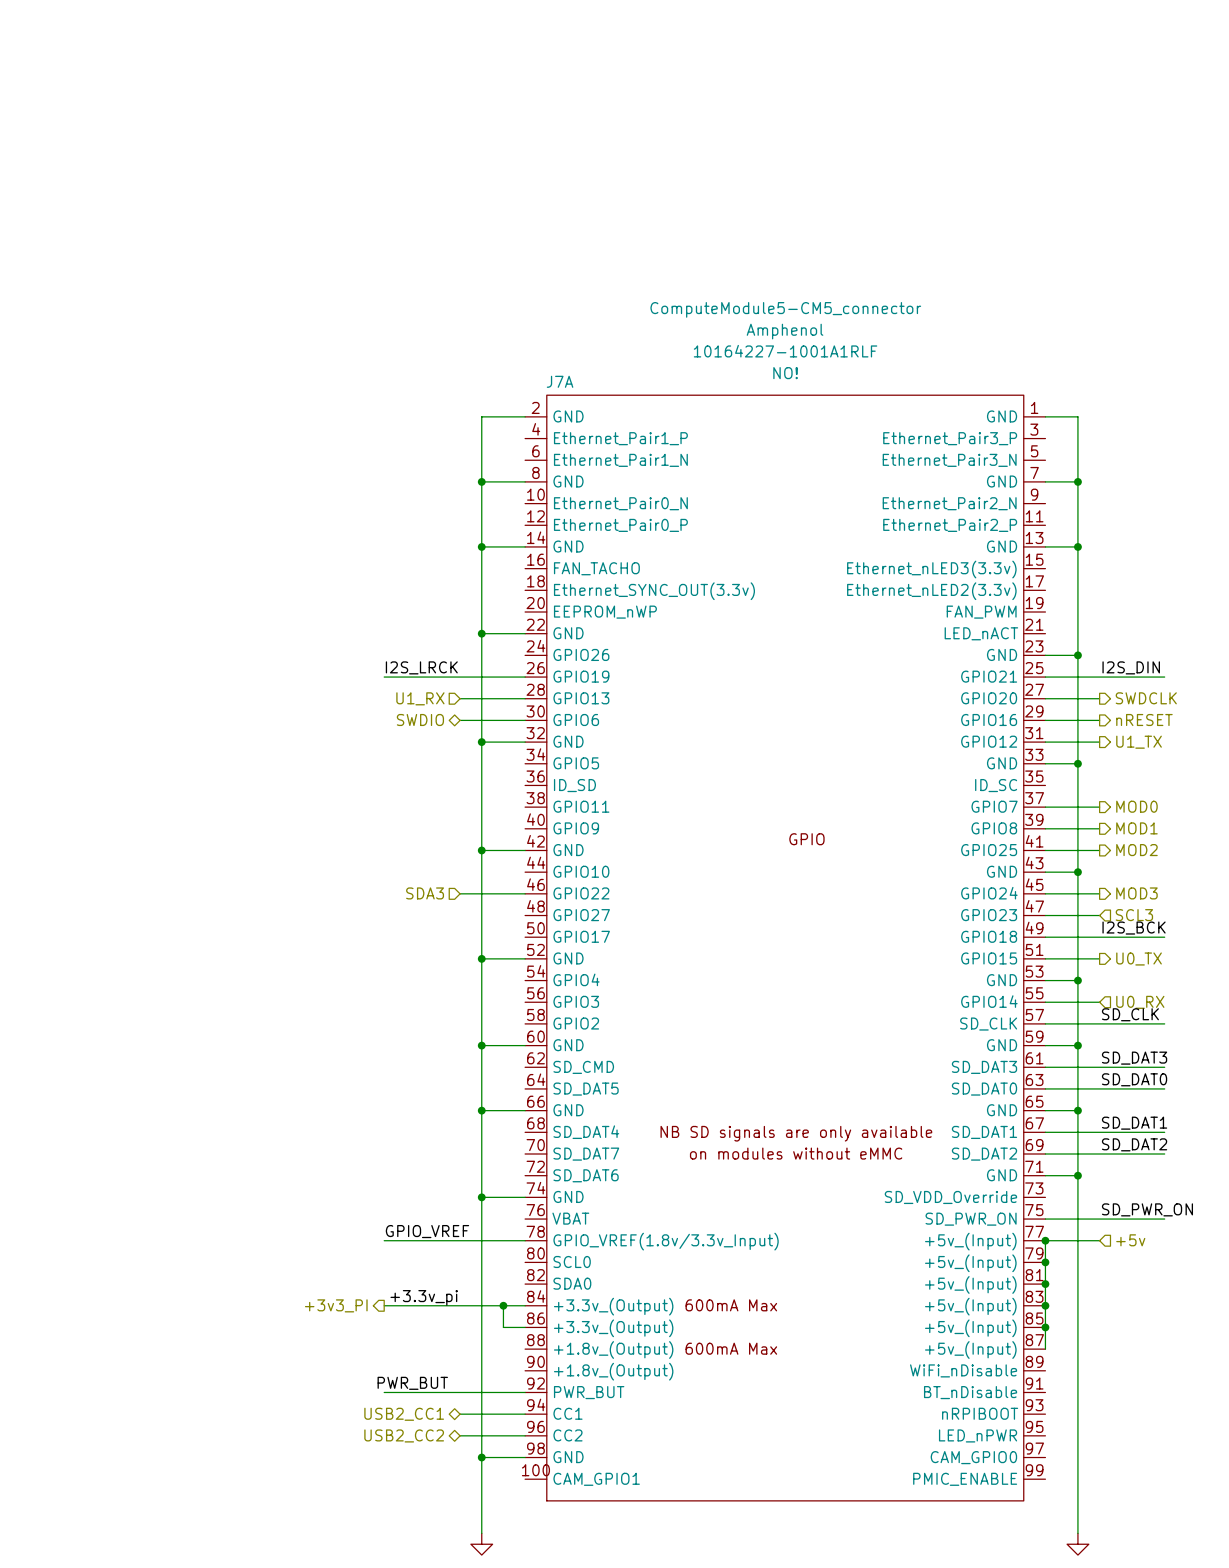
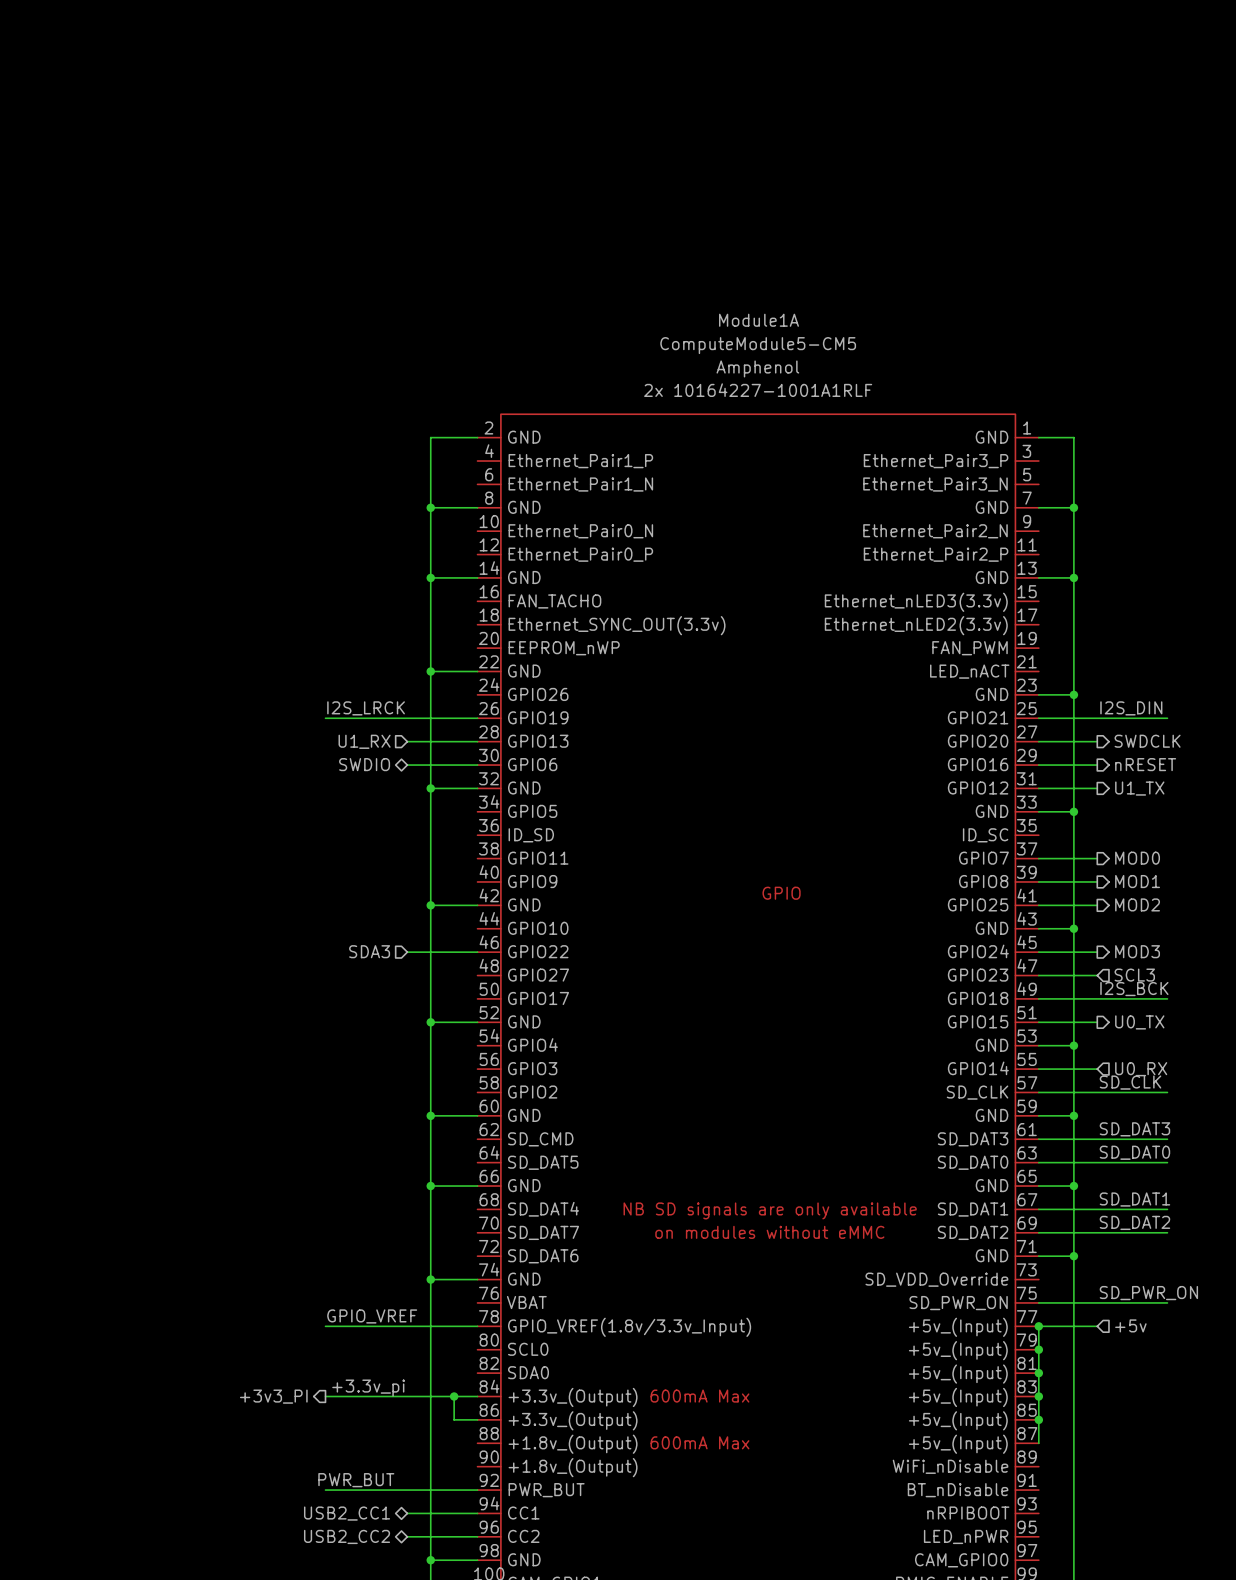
J7A value: ComputeModule5-CM5_connector (785, 309) -> ComputeModule5-CM5 (758, 345)
J7A text: Amphenol (785, 331) -> none
J7A text: 10164227-1001A1RLF (785, 351) -> none
J7A text: none -> Amphenol (757, 368)
J7A text: none -> 2x 10164227-1001A1RLF (758, 390)
J7A text: NO! (785, 373) -> none
J7A name: J7A (560, 381) -> Module1A (759, 320)

